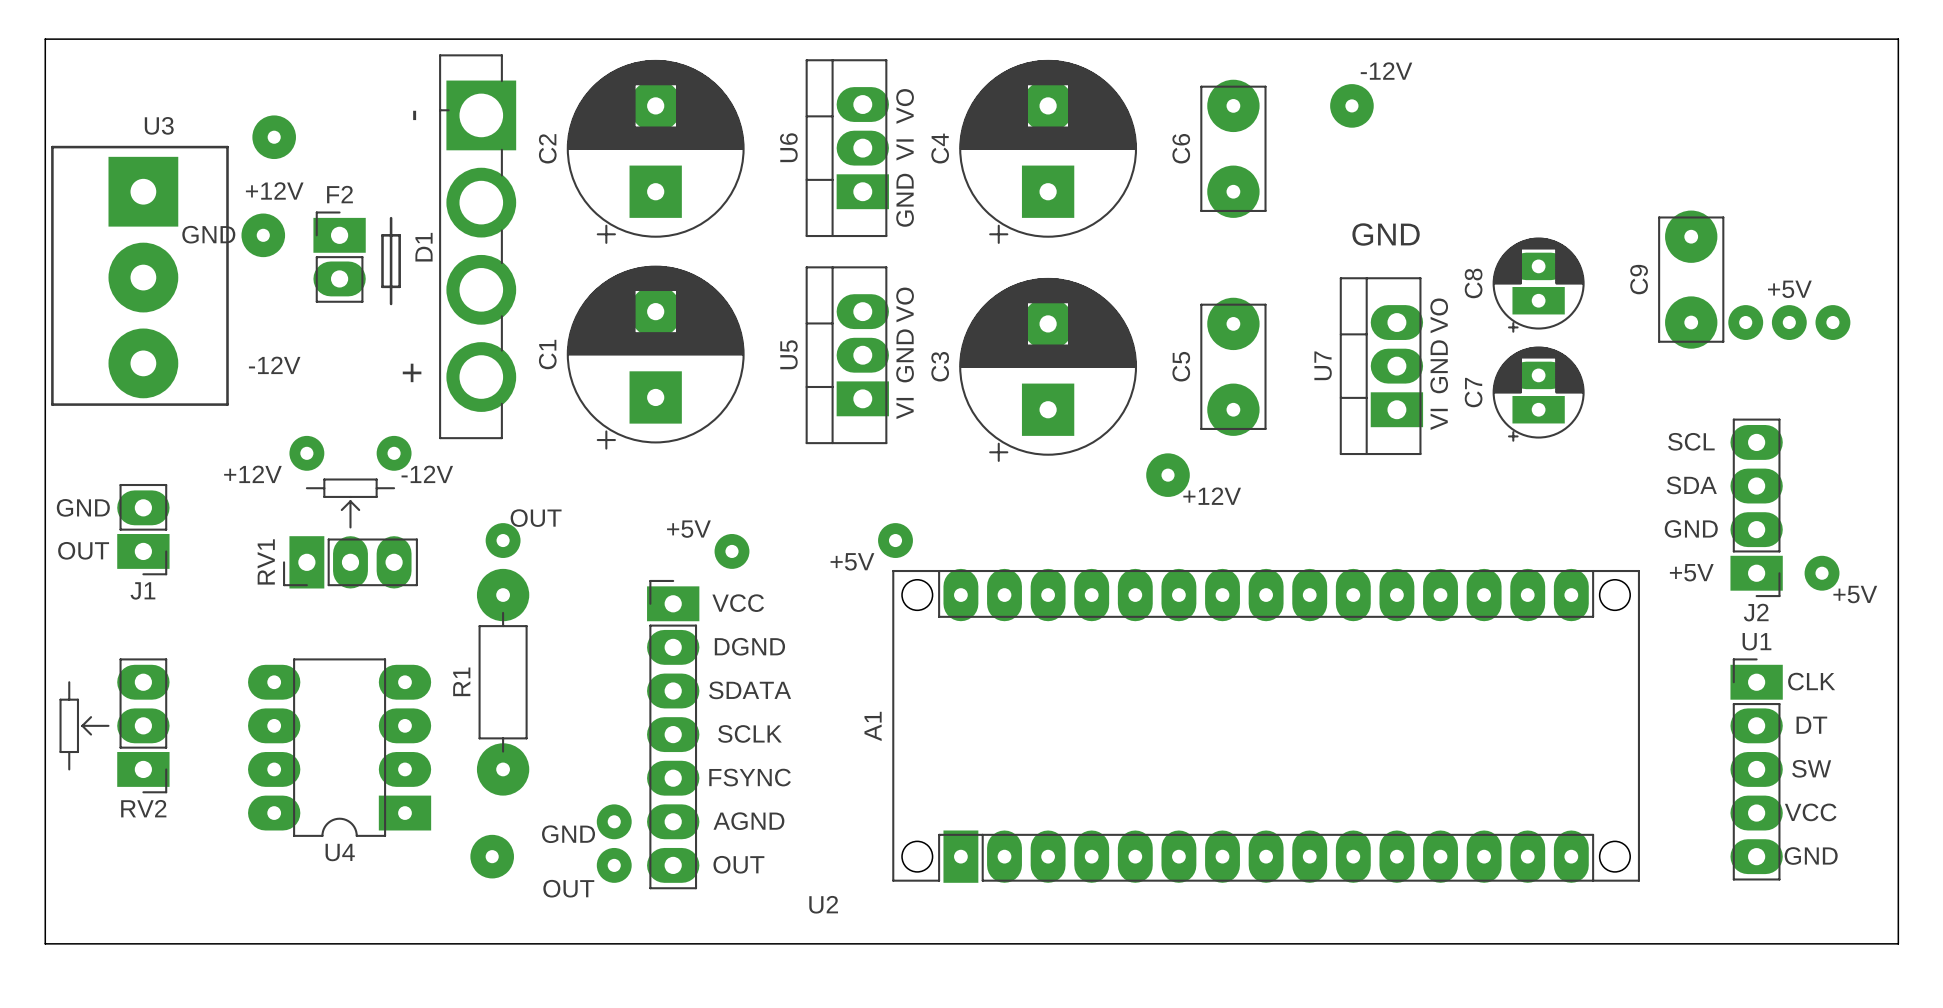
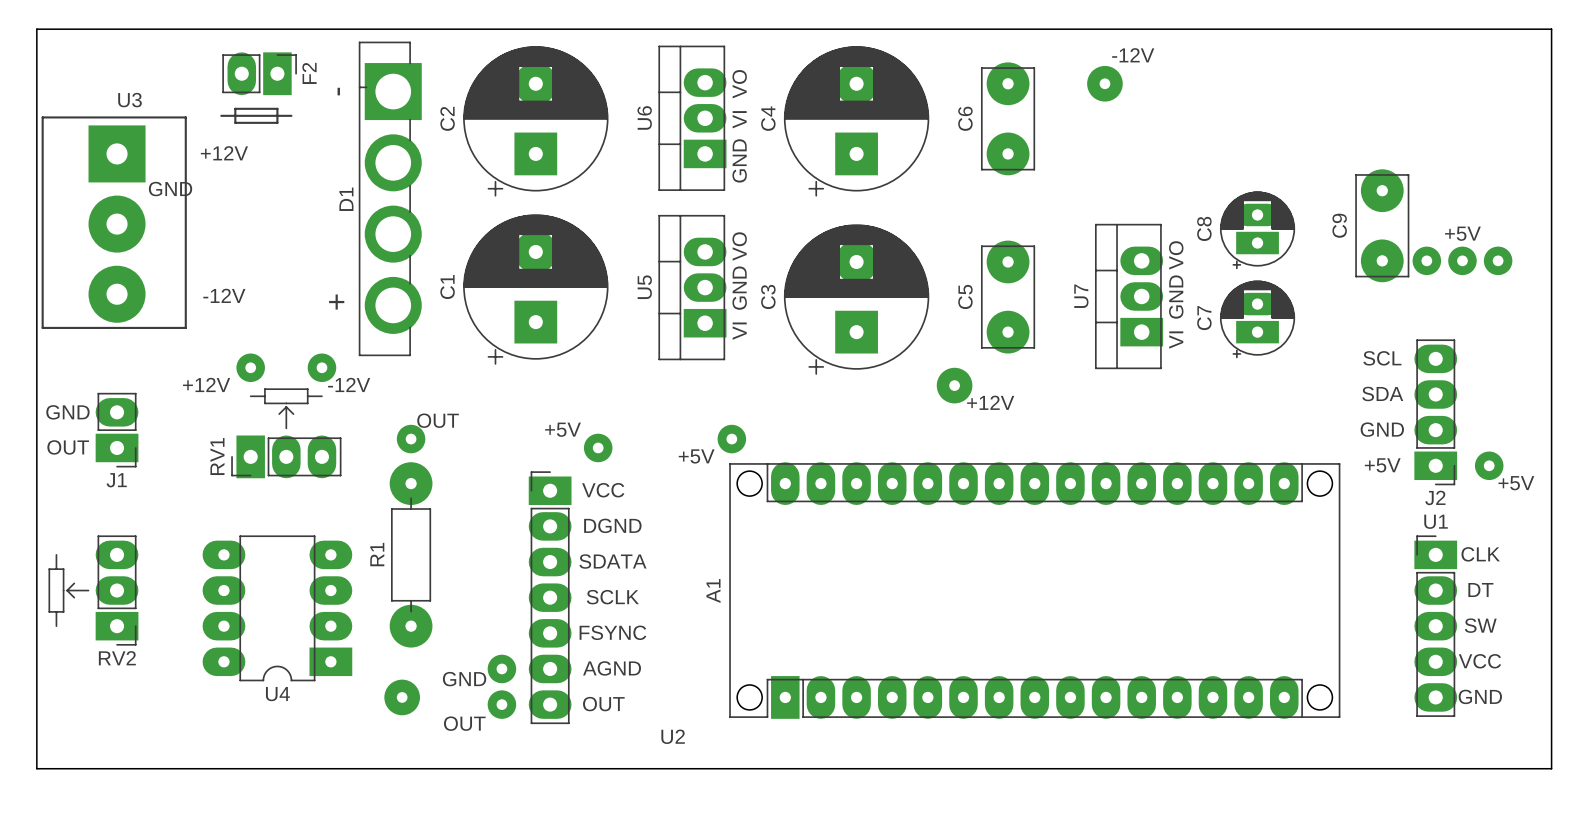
via: (274, 137) -> none
text: GND (1386, 234) -> none
via: (263, 235) -> none
F2 rotation: 0° (357, 258) -> 90° clockwise (258, 88)
F2 position: (357, 258) -> (258, 88)

